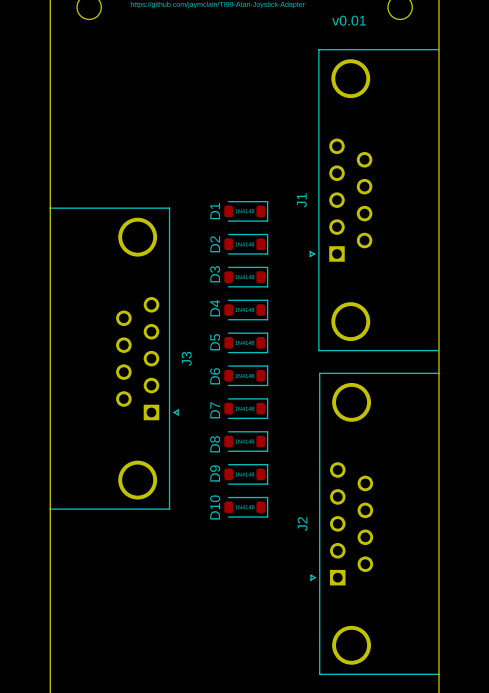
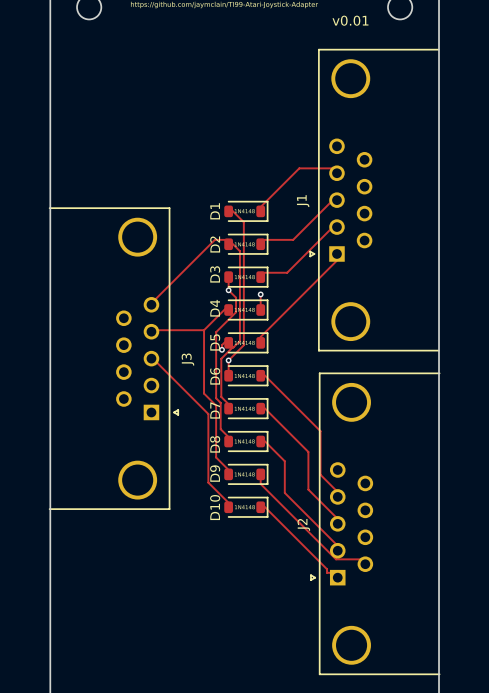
track: none -> (337, 168) (299, 168) (260, 206)
track: none -> (337, 195) (293, 239) (260, 239)
track: none -> (228, 206) (243, 222) (243, 345) (228, 360) (228, 371)
track: none -> (337, 222) (287, 272) (260, 272)
track: none -> (337, 249) (337, 259) (260, 338)
track: none -> (228, 272) (228, 290) (236, 297) (236, 312) (216, 332) (216, 398) (220, 402) (220, 429) (228, 437)
via: none -> (228, 290)
track: none -> (260, 294) (260, 305)
via: none -> (260, 294)
track: none -> (151, 303) (214, 239) (228, 239) (239, 251) (239, 340) (221, 358) (221, 396) (228, 404)
track: none -> (228, 305) (204, 330)
track: none -> (151, 330) (204, 330)
track: none -> (204, 330) (204, 393) (216, 405) (216, 457) (228, 470)
track: none -> (228, 338) (221, 345) (221, 349)
via: none -> (221, 349)
track: none -> (151, 357) (208, 414) (208, 482) (228, 502)
via: none -> (228, 360)
track: none -> (260, 371) (320, 431) (320, 474) (337, 492)
track: none -> (260, 404) (308, 451) (308, 489) (337, 518)
track: none -> (260, 437) (284, 461) (284, 492) (337, 545)
track: none -> (260, 470) (260, 484) (336, 559) (365, 559)
track: none -> (260, 502) (327, 569) (327, 572) (337, 572)

